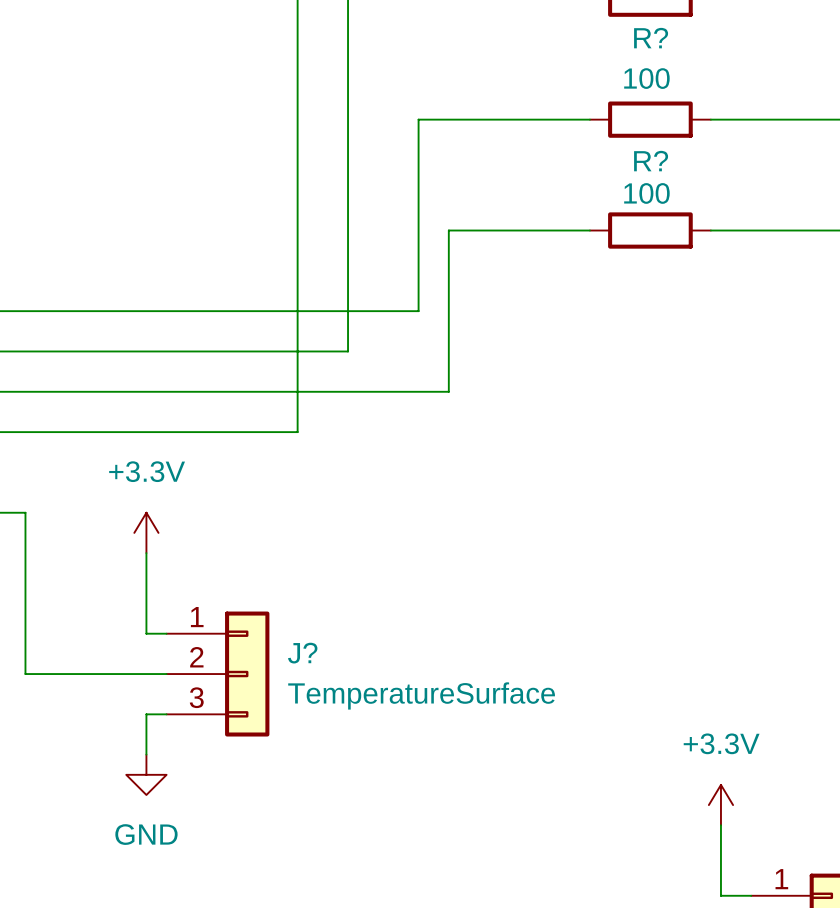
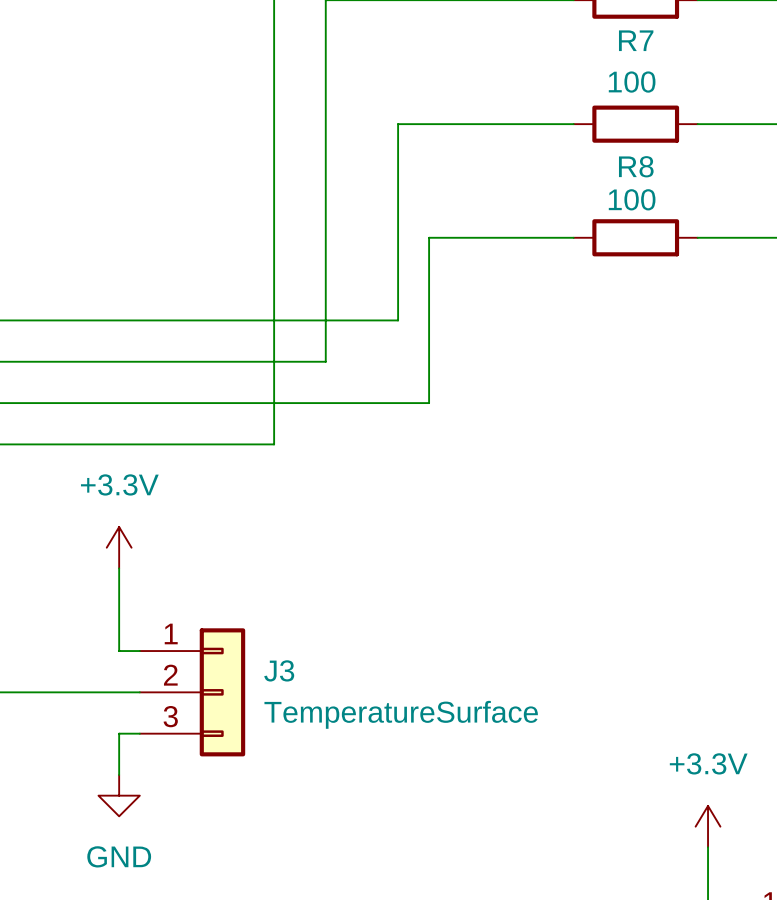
R? name: R? (651, 38) -> R7 (636, 40)
R? name: R? (651, 161) -> R8 (636, 166)
J? name: J? (302, 653) -> J3 (279, 670)

